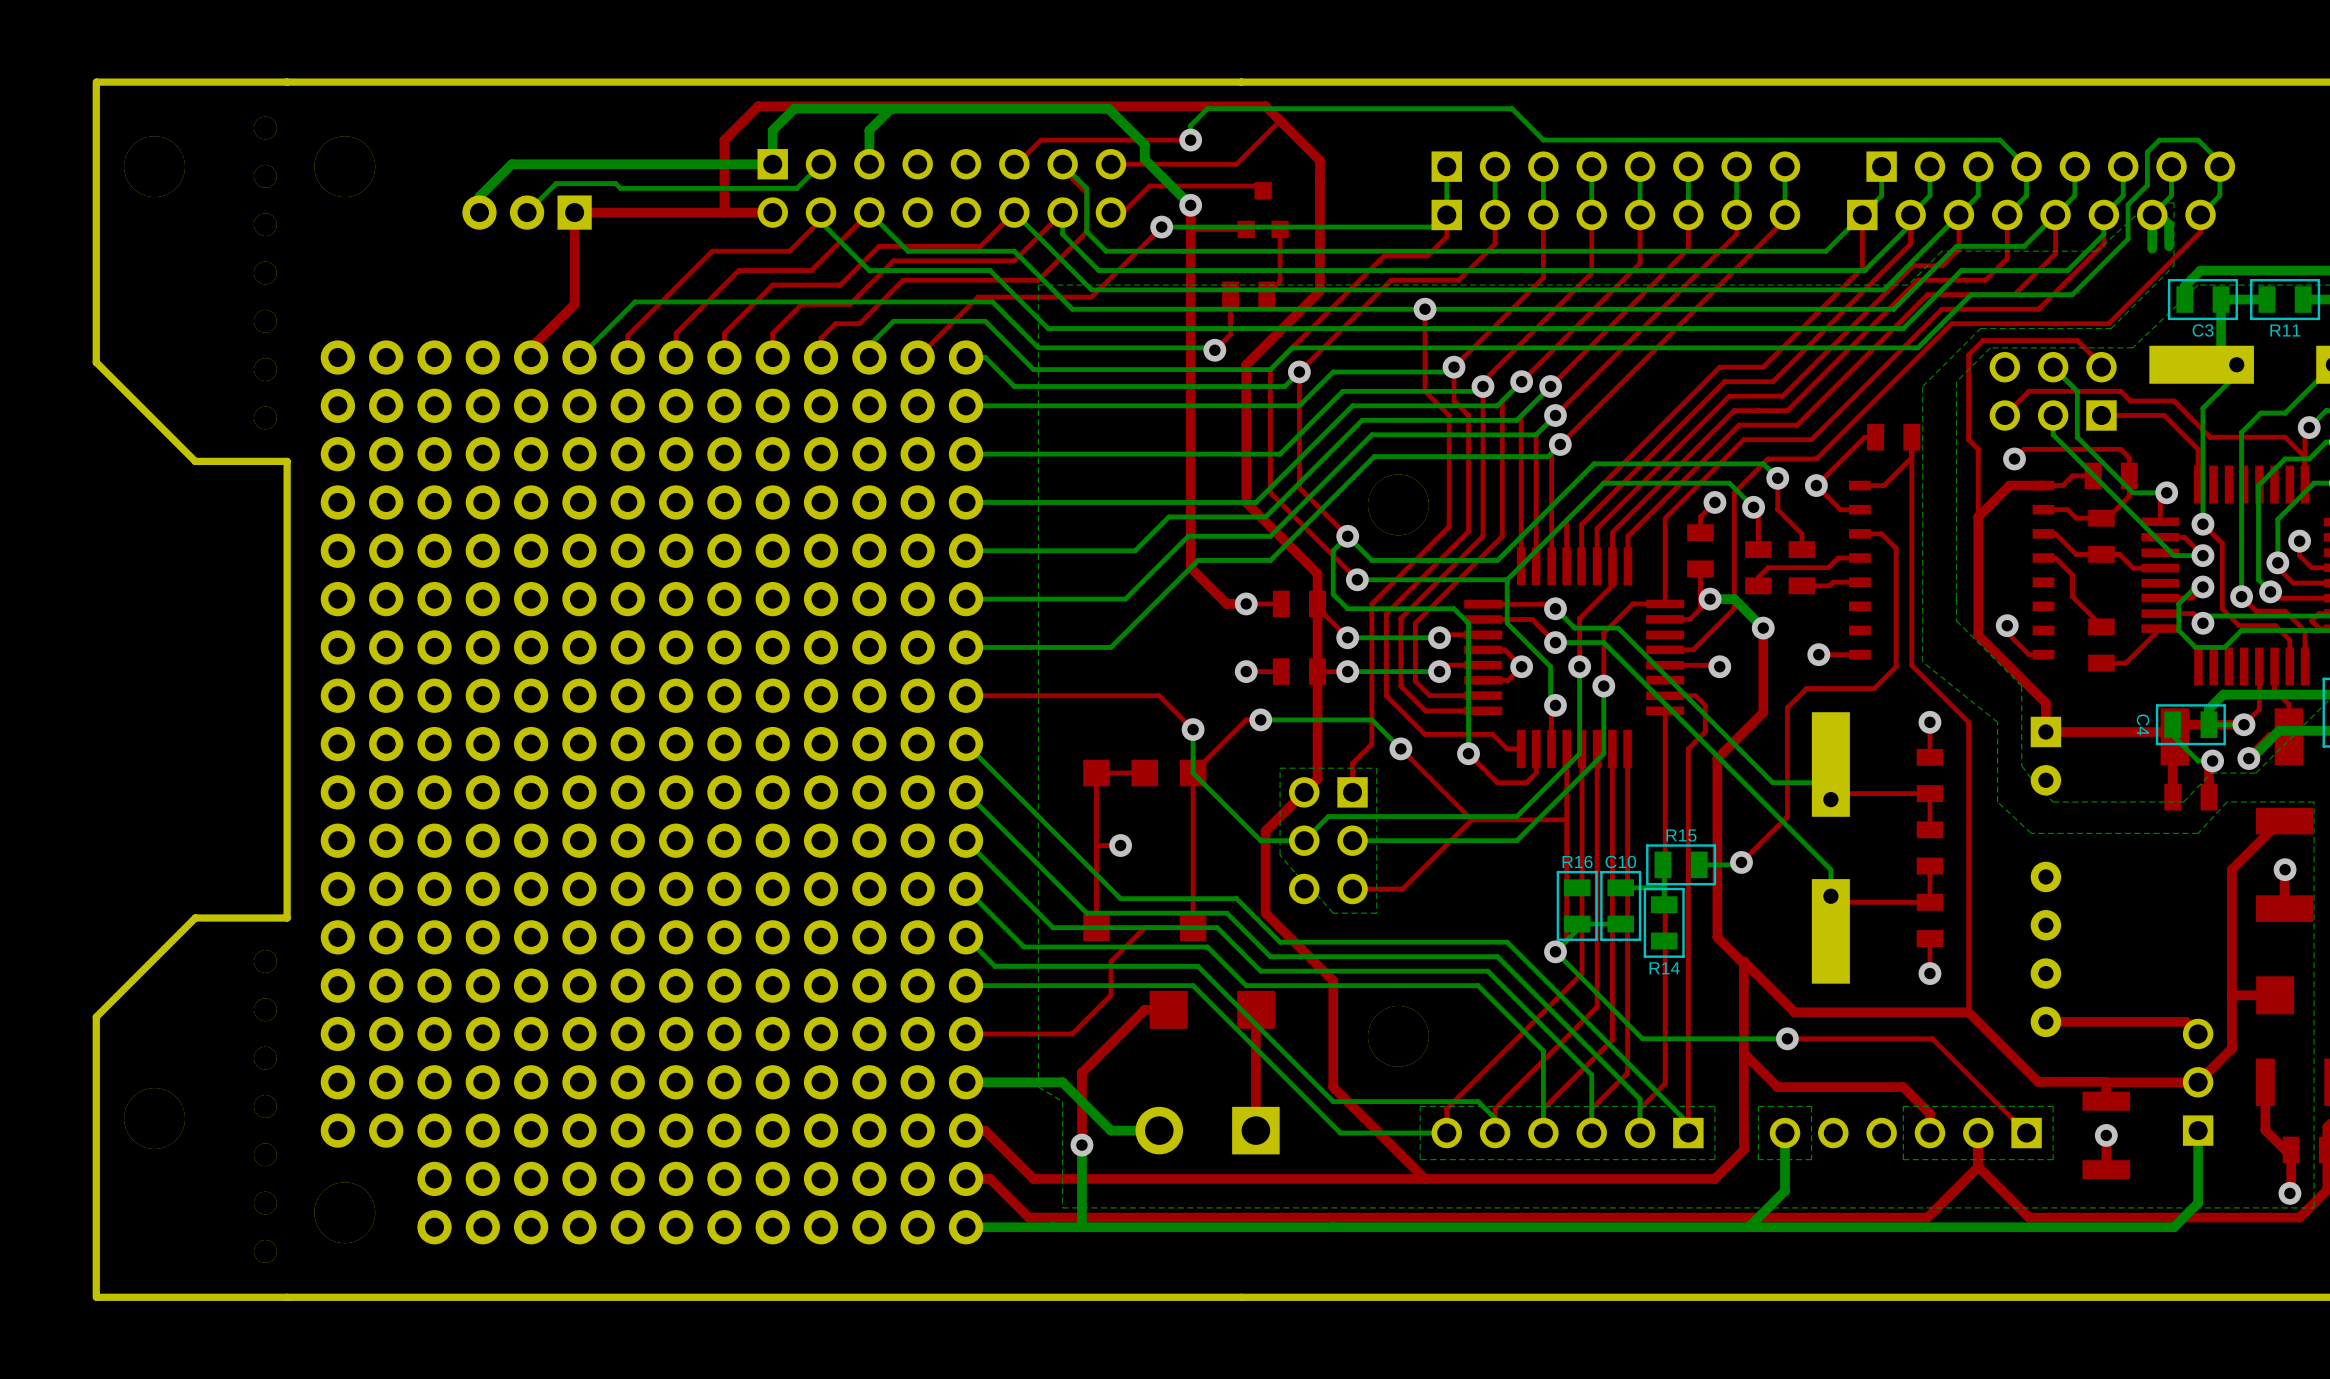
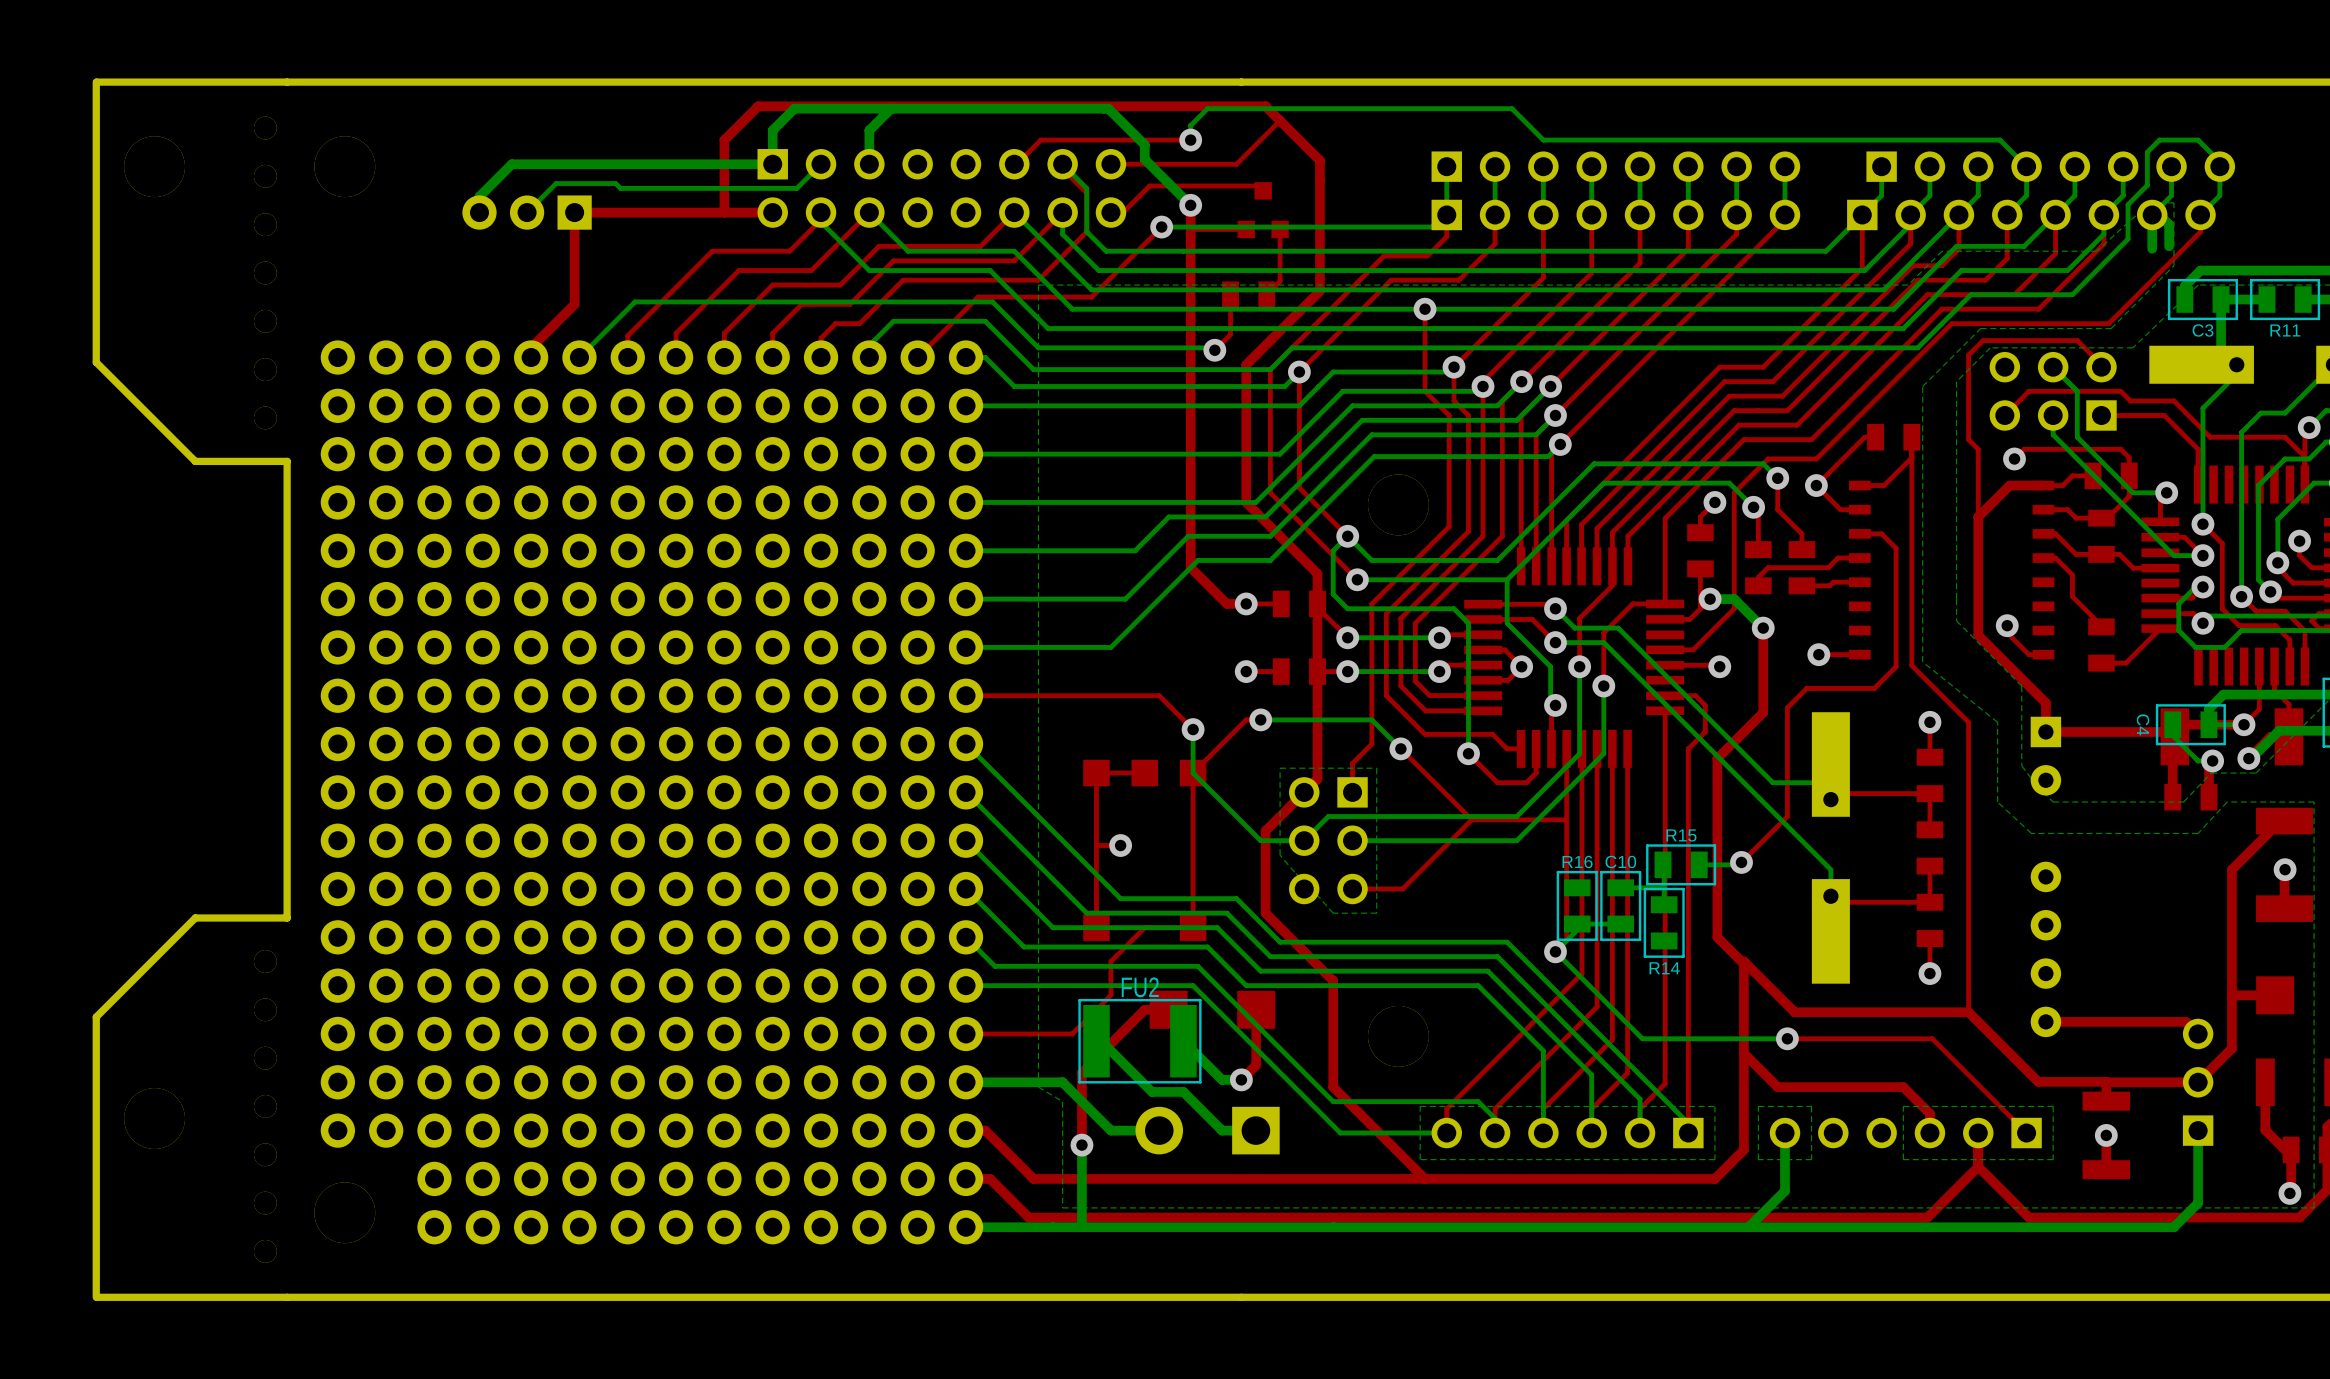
top track: (1256, 1009) (1255, 1130) -> (1256, 1009) (1256, 1065) (1241, 1079)
bottom track: none -> (1096, 1041) (1101, 1041) (1152, 1091) (1183, 1091) (1222, 1130) (1255, 1130)
FU2: none -> (1139, 1041)
bottom track: none -> (1183, 1041) (1222, 1079) (1241, 1079)
via: none -> (1241, 1079)

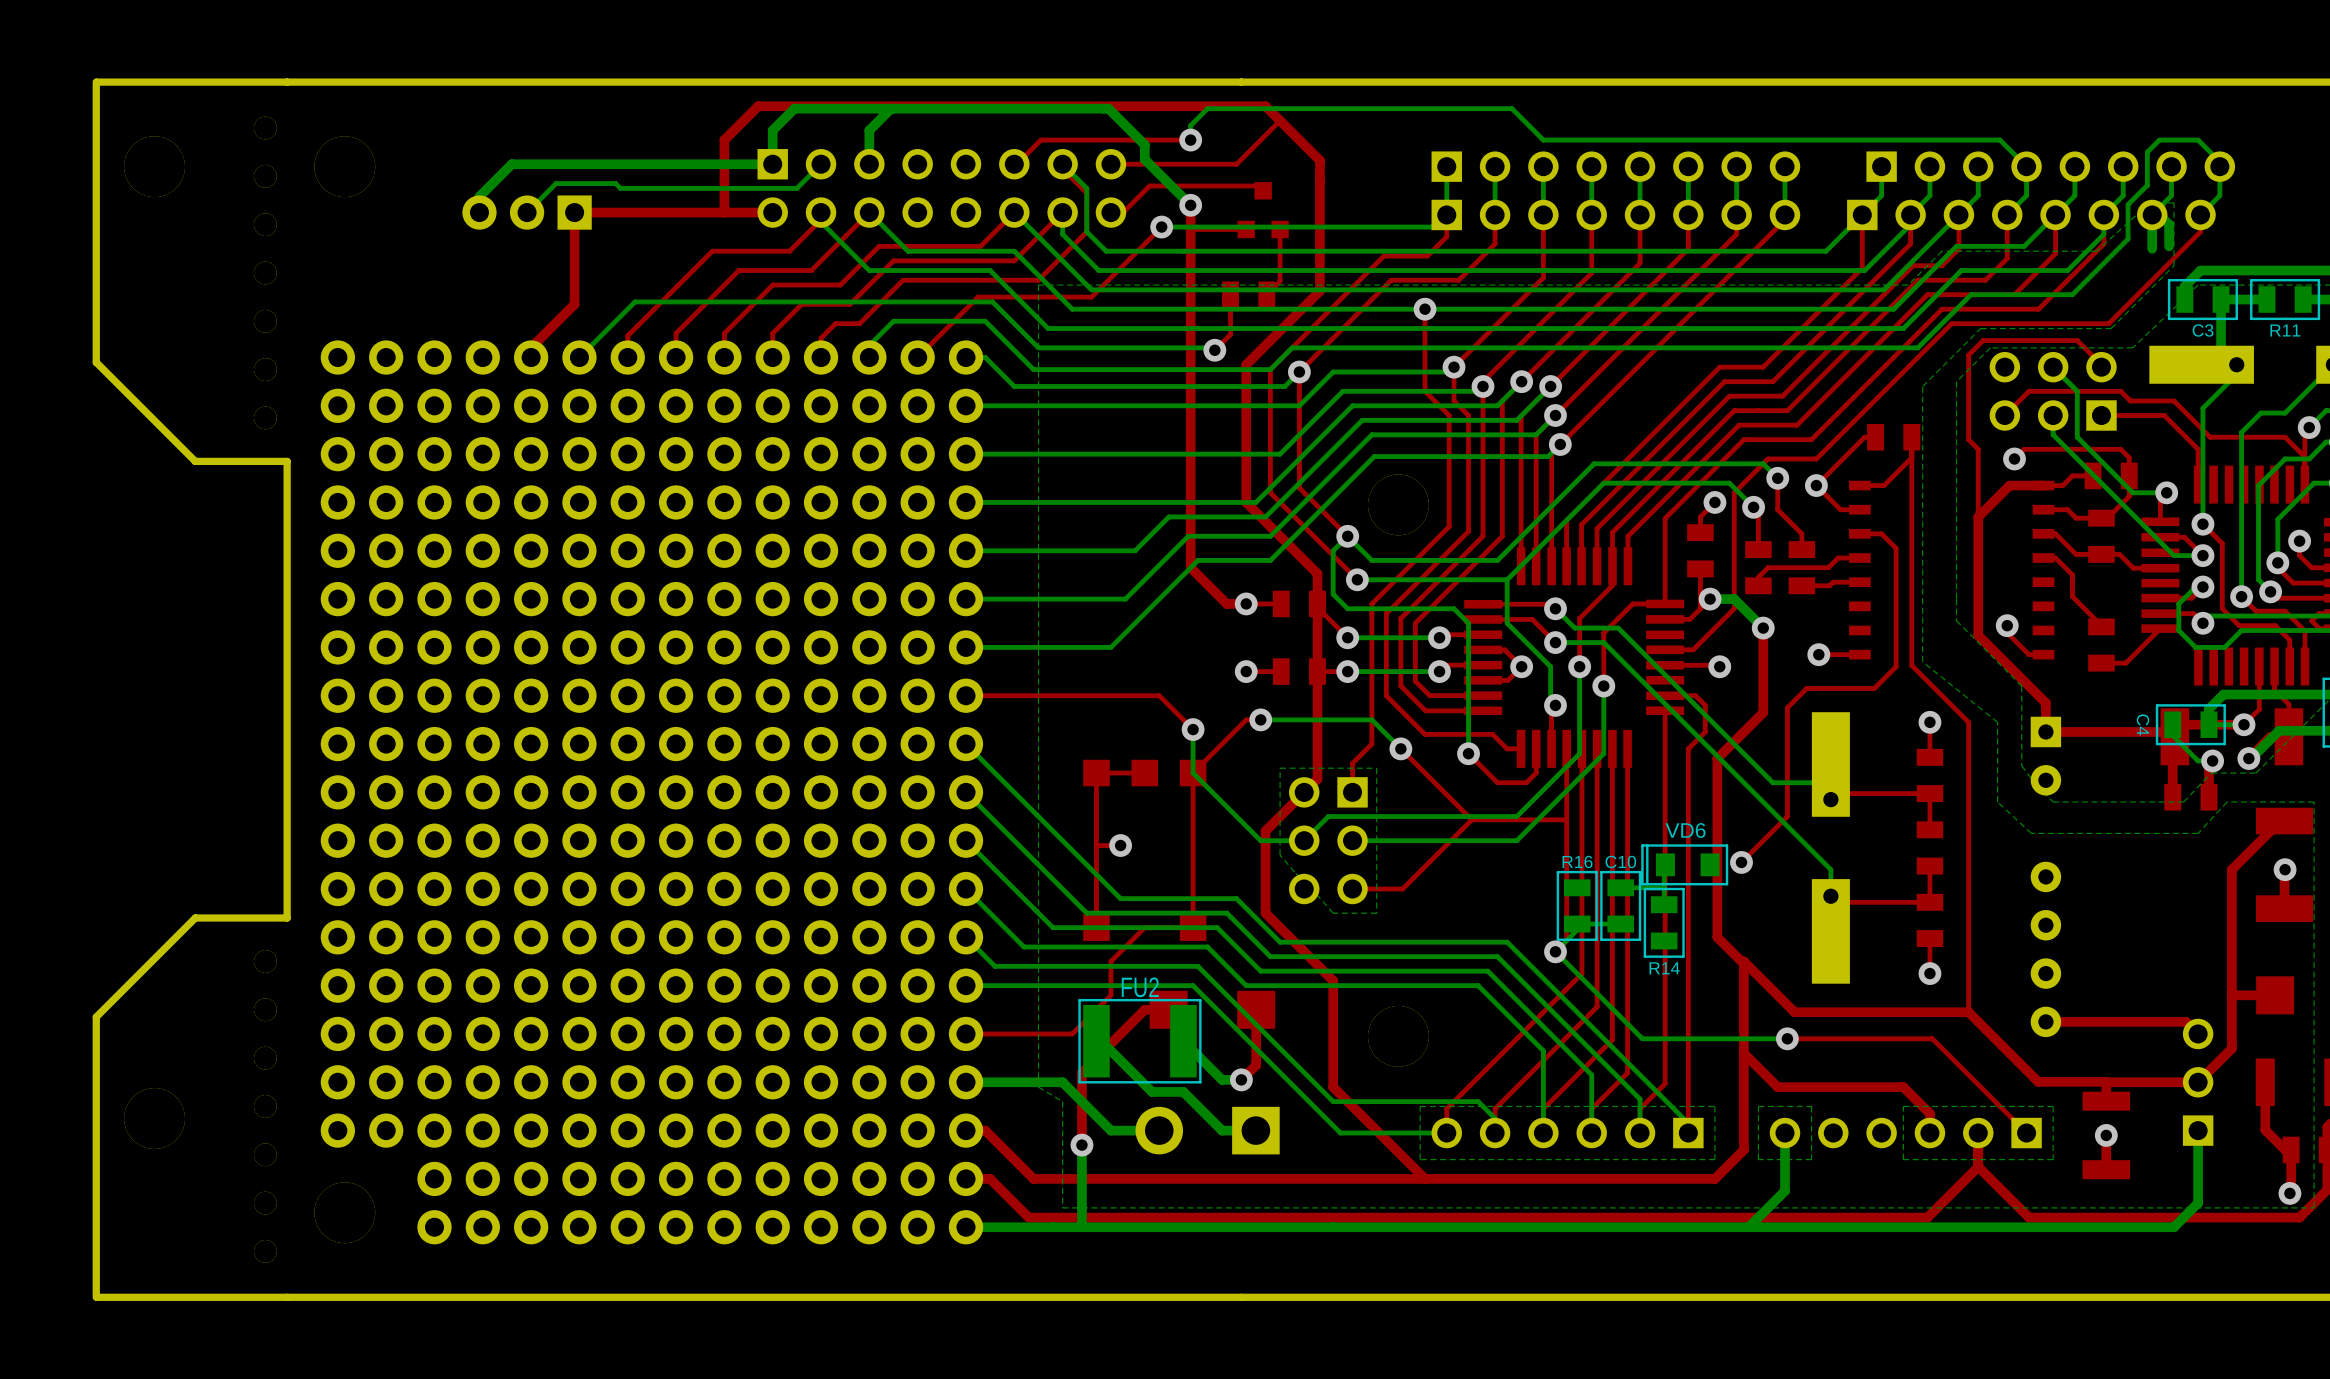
R15: (1681, 864) -> none
VD6: none -> (1684, 864)
bottom track: (1739, 864) (1699, 864) -> none

